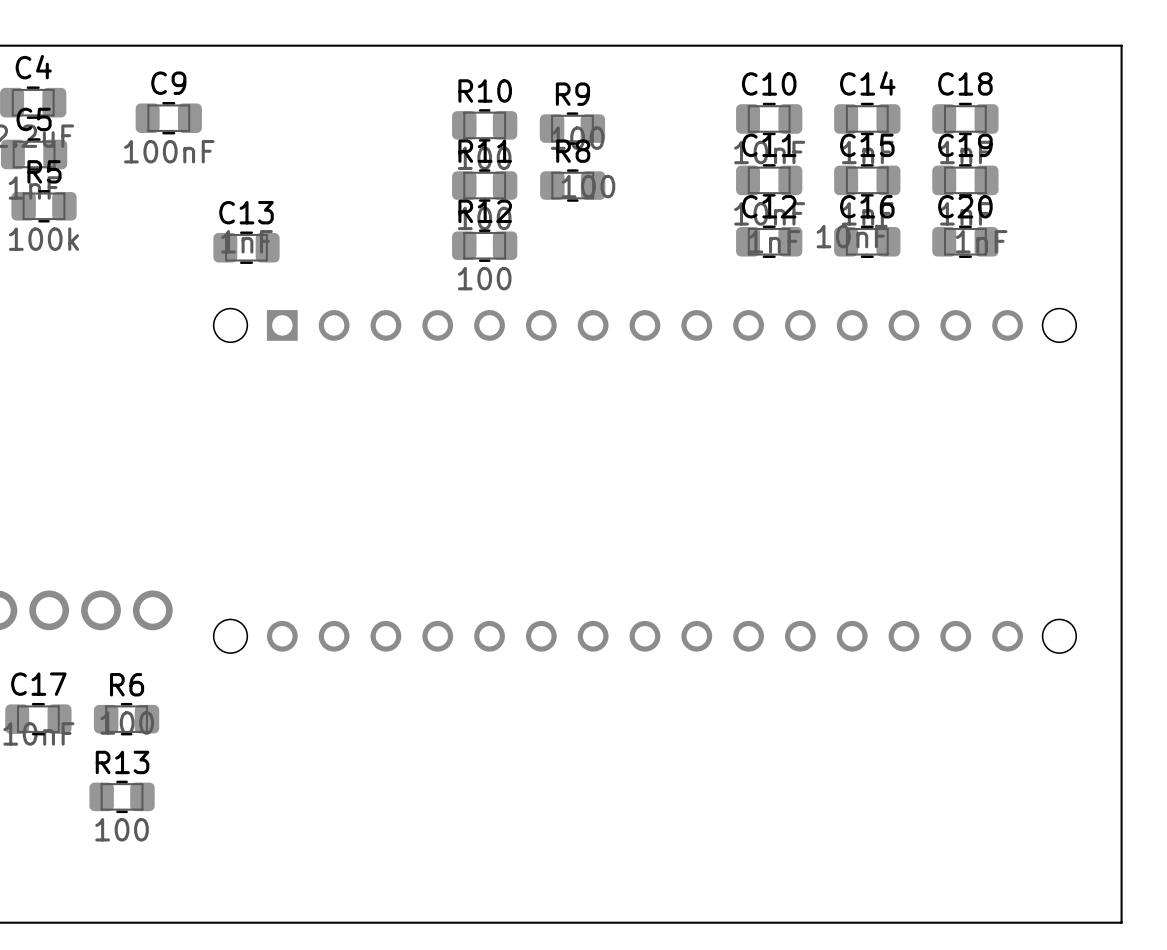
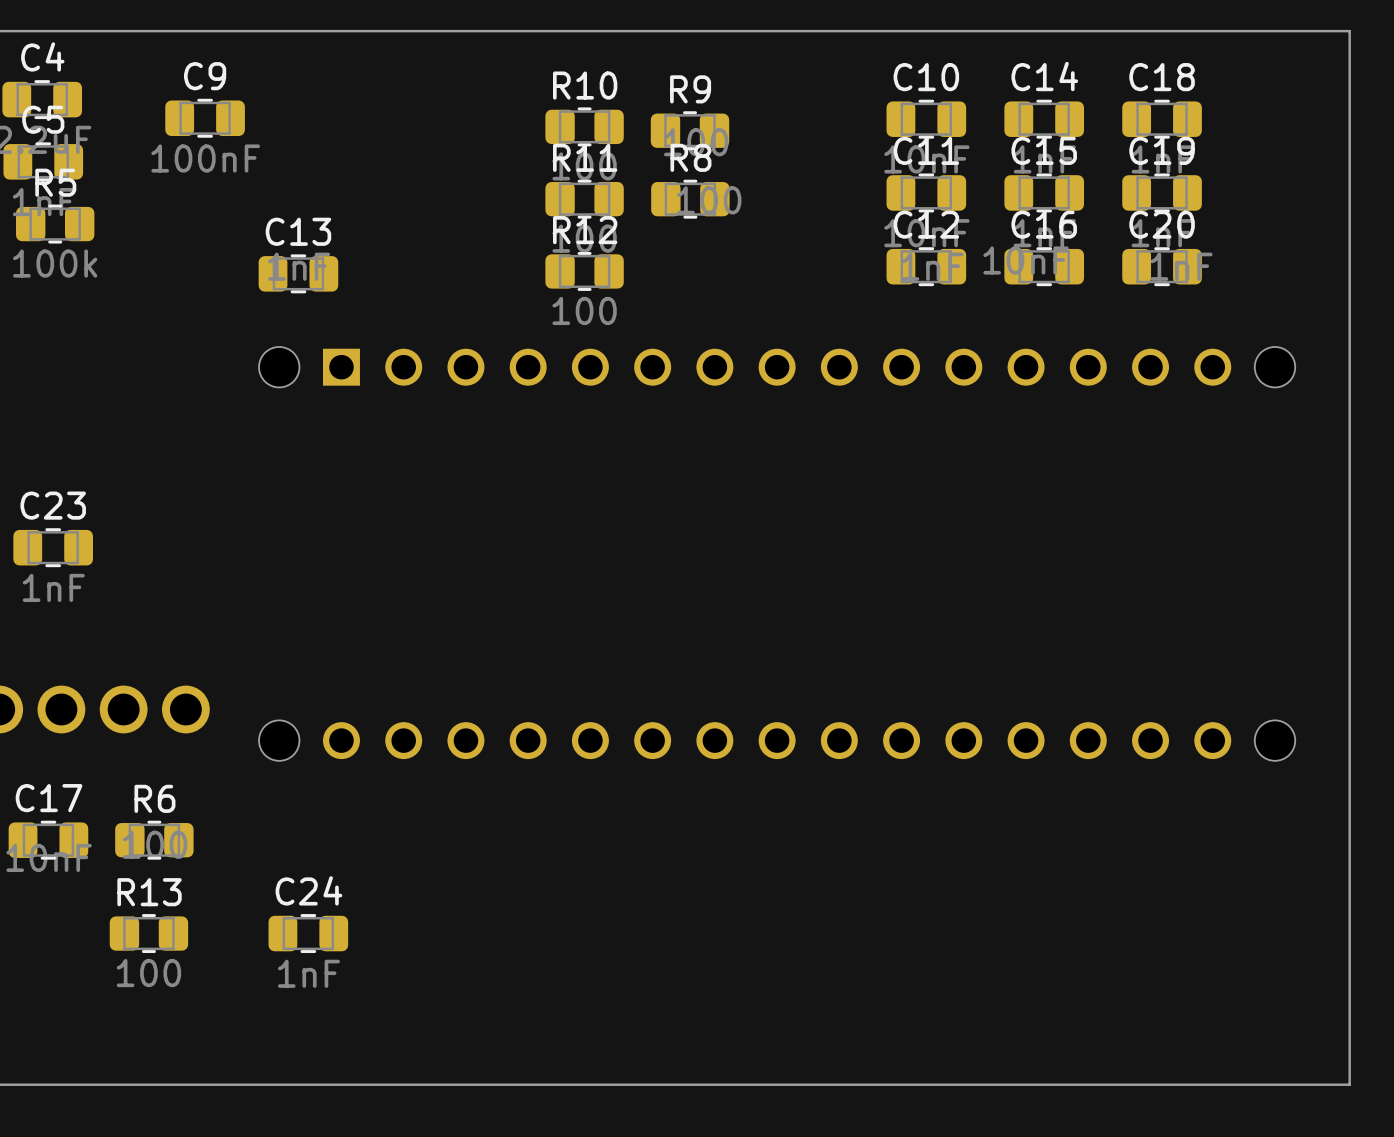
C23: none -> 1nF (53, 547)
C24: none -> 1nF (308, 933)

